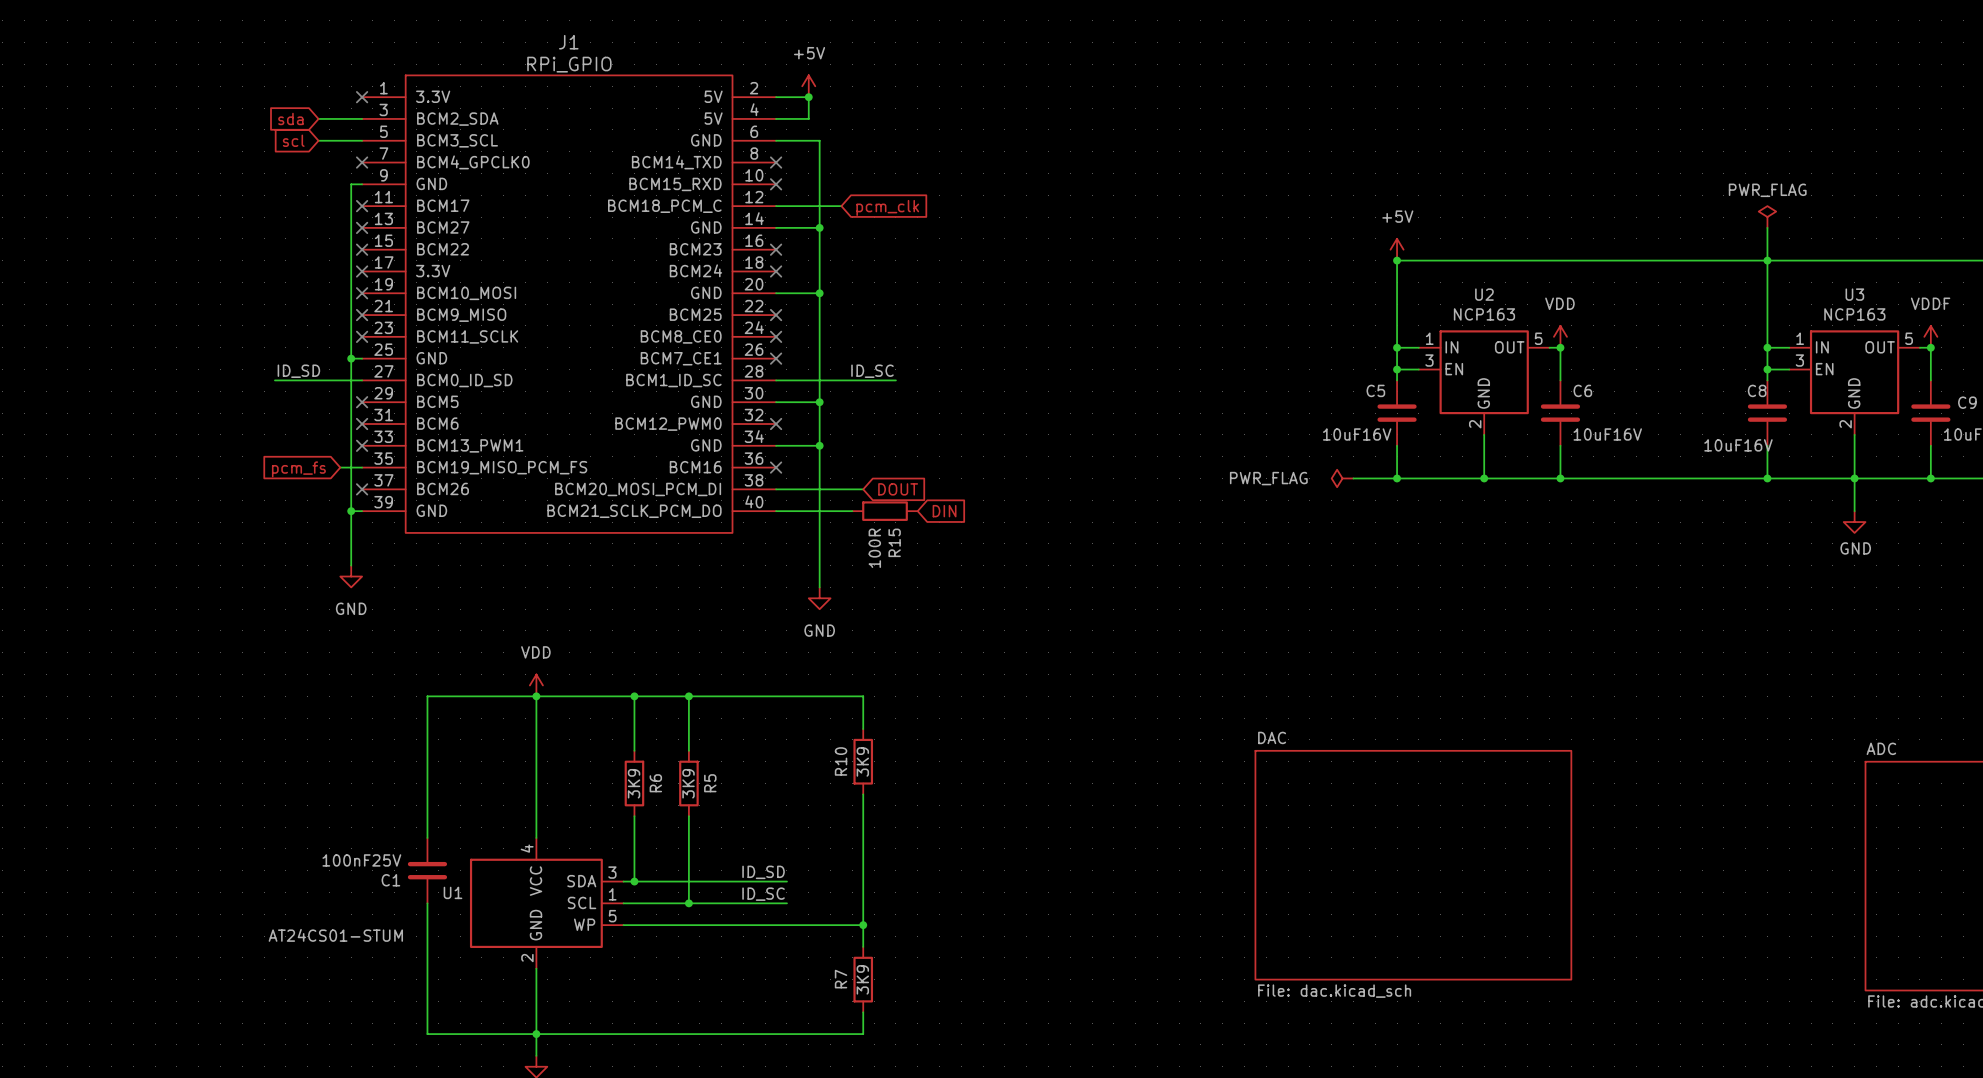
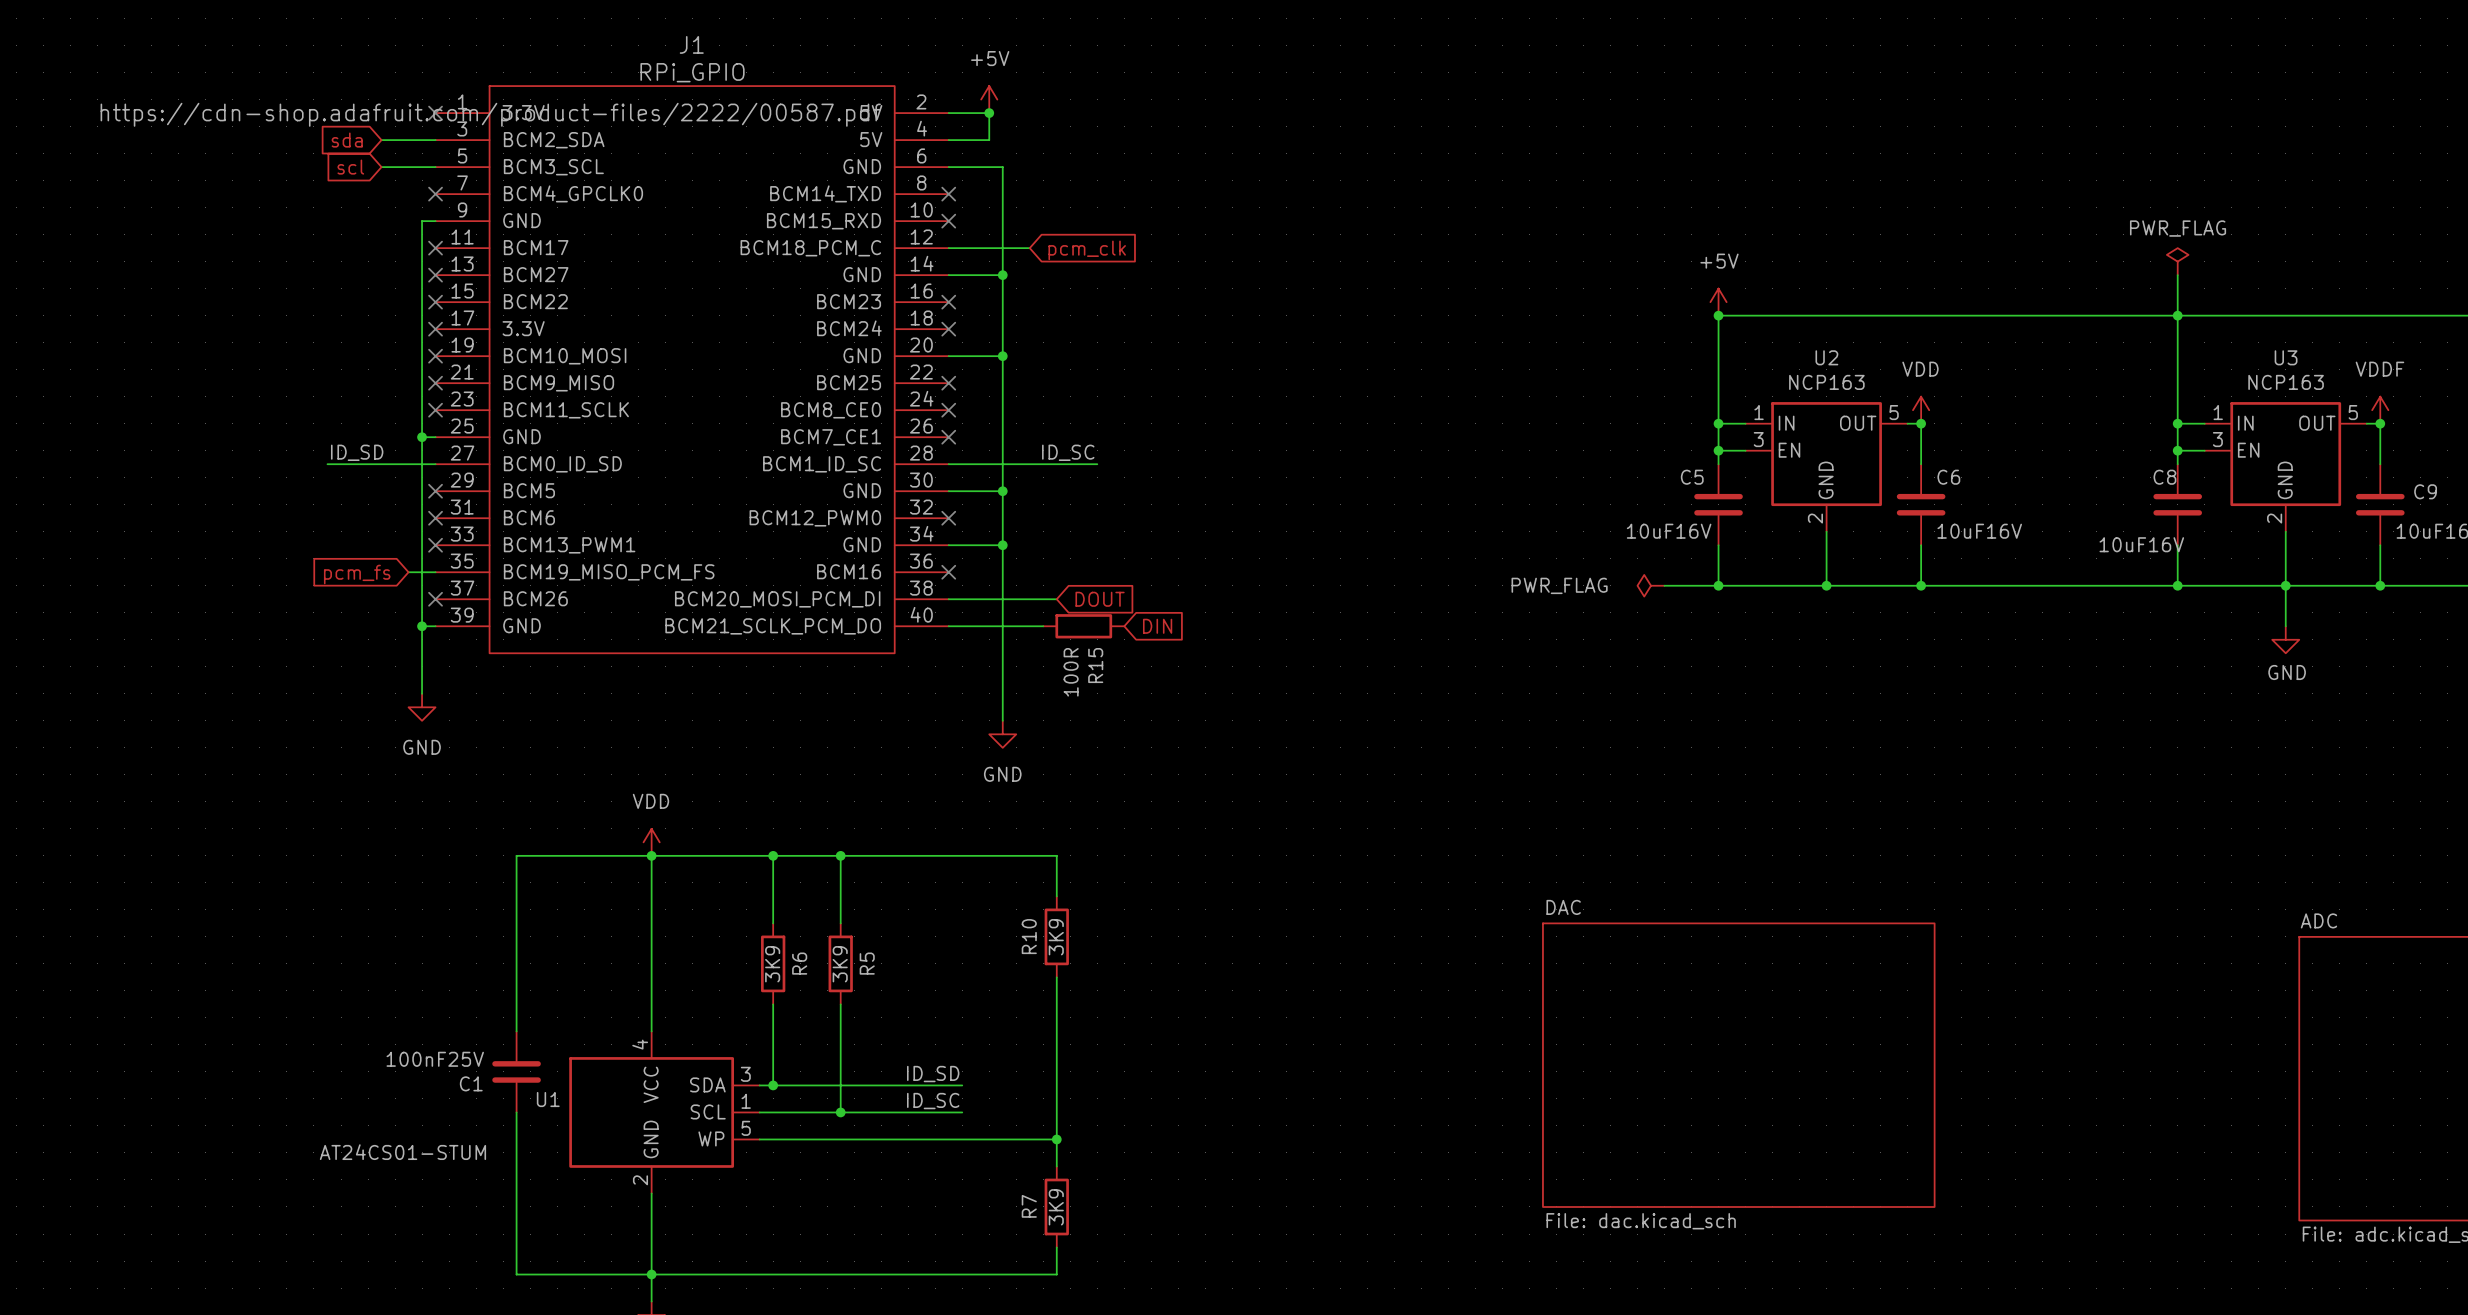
J1 text: none -> https://cdn-shop.adafruit.com/product-files/2222/00587.pdf (490, 114)

